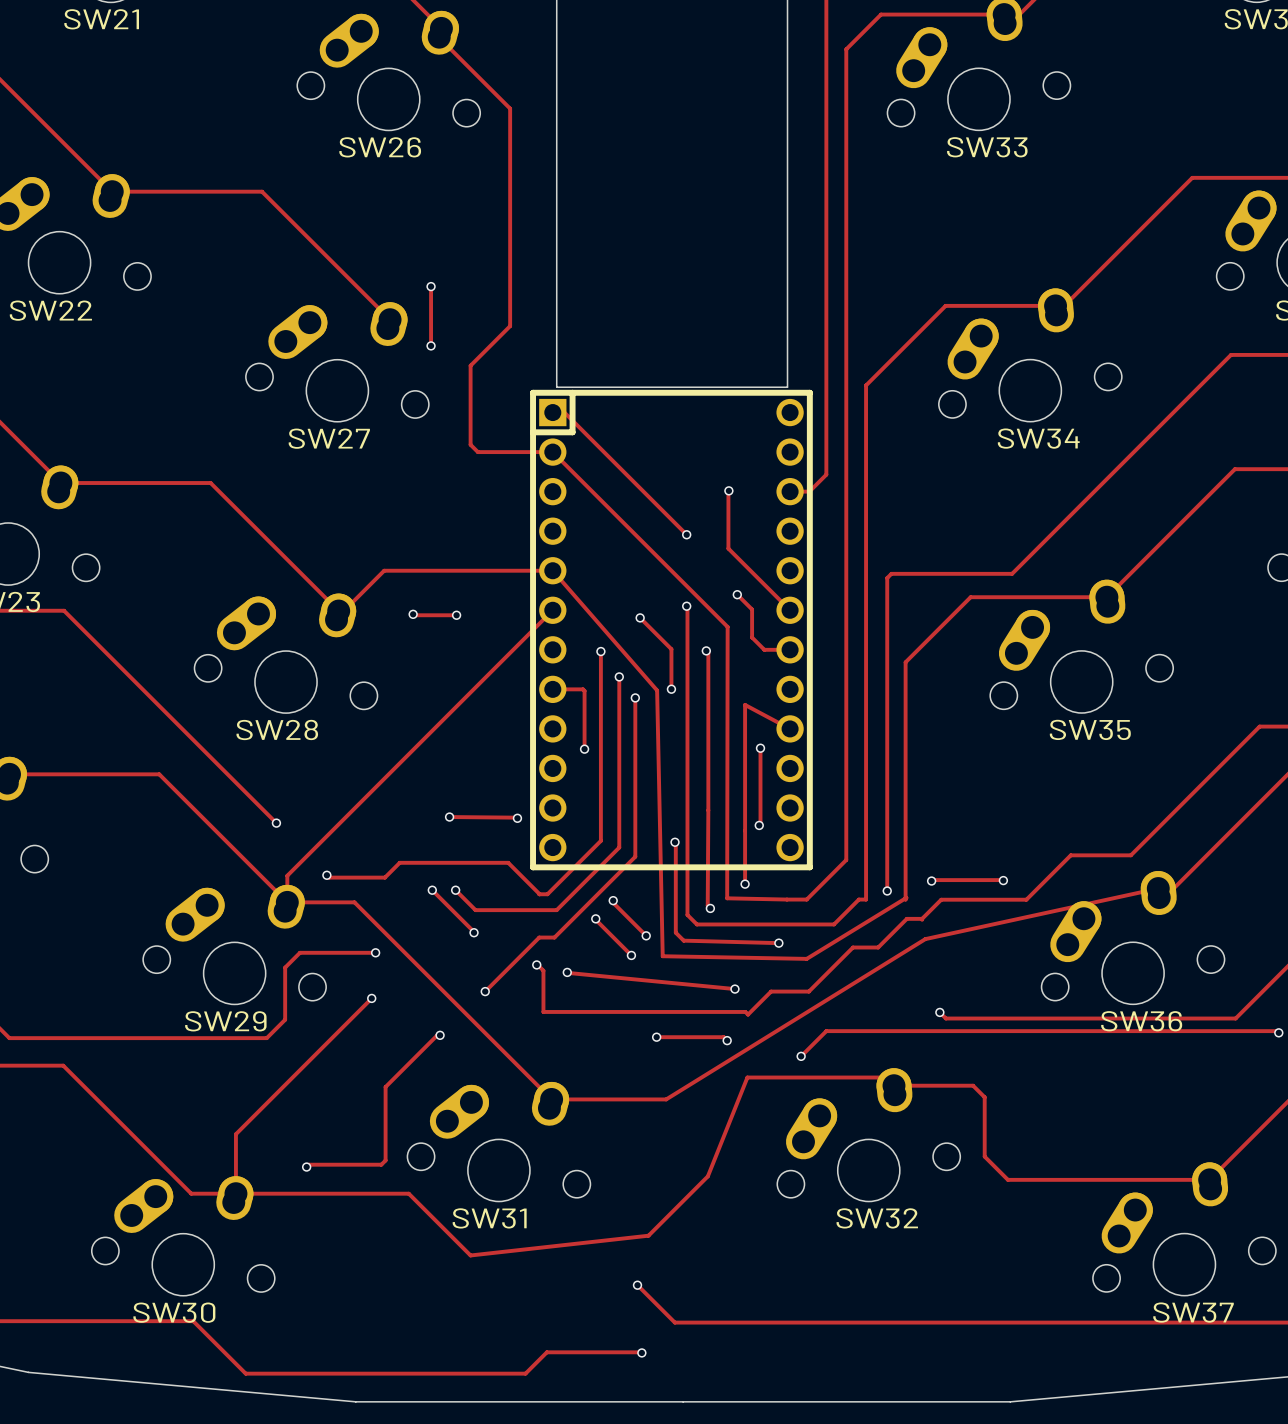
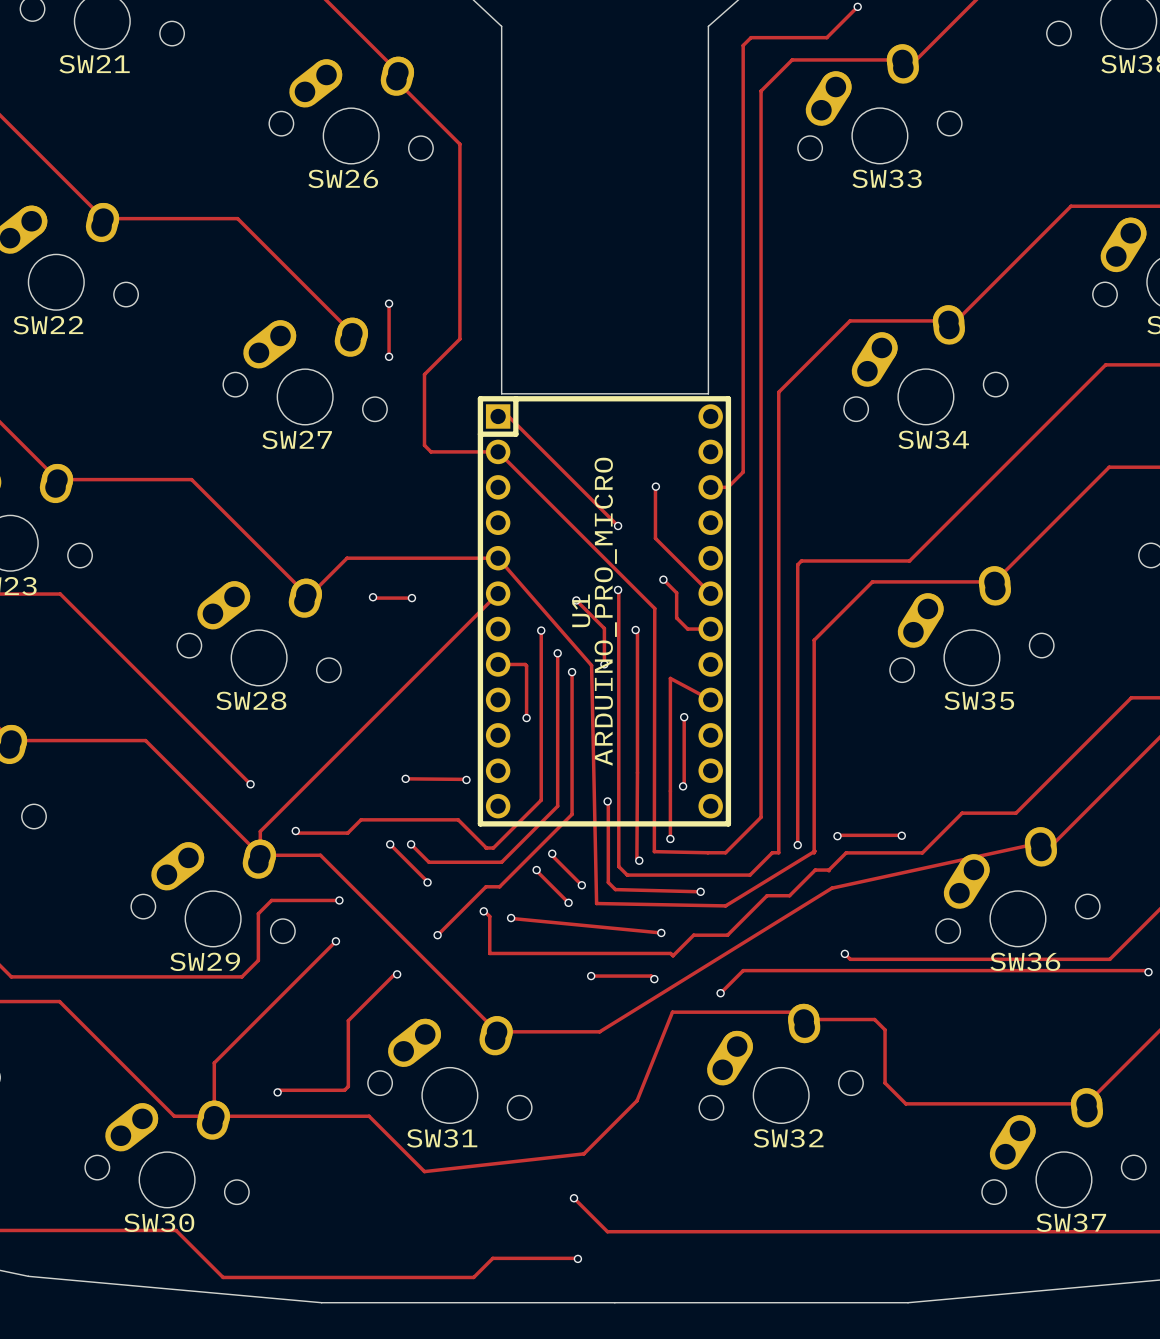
U1 name: none -> U1 (581, 610)
U1 value: none -> ARDUINO_PRO_MICRO (605, 611)

